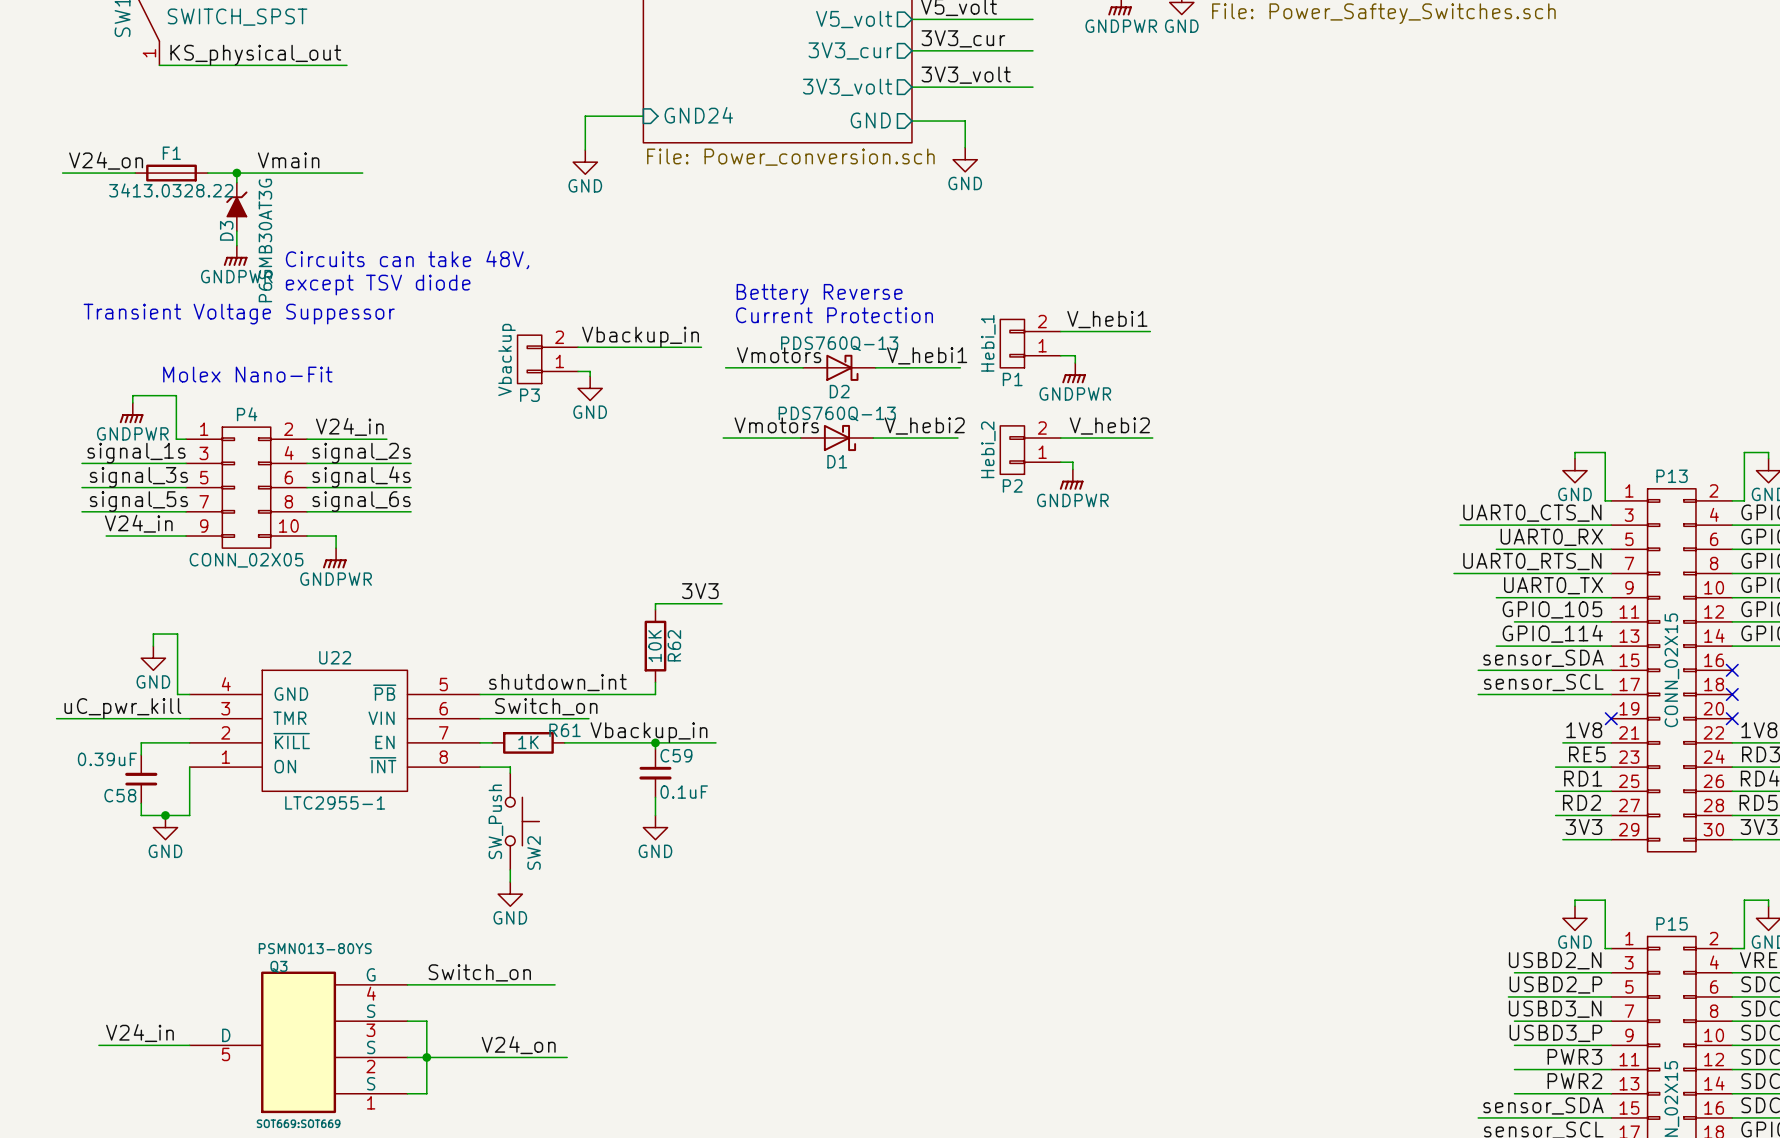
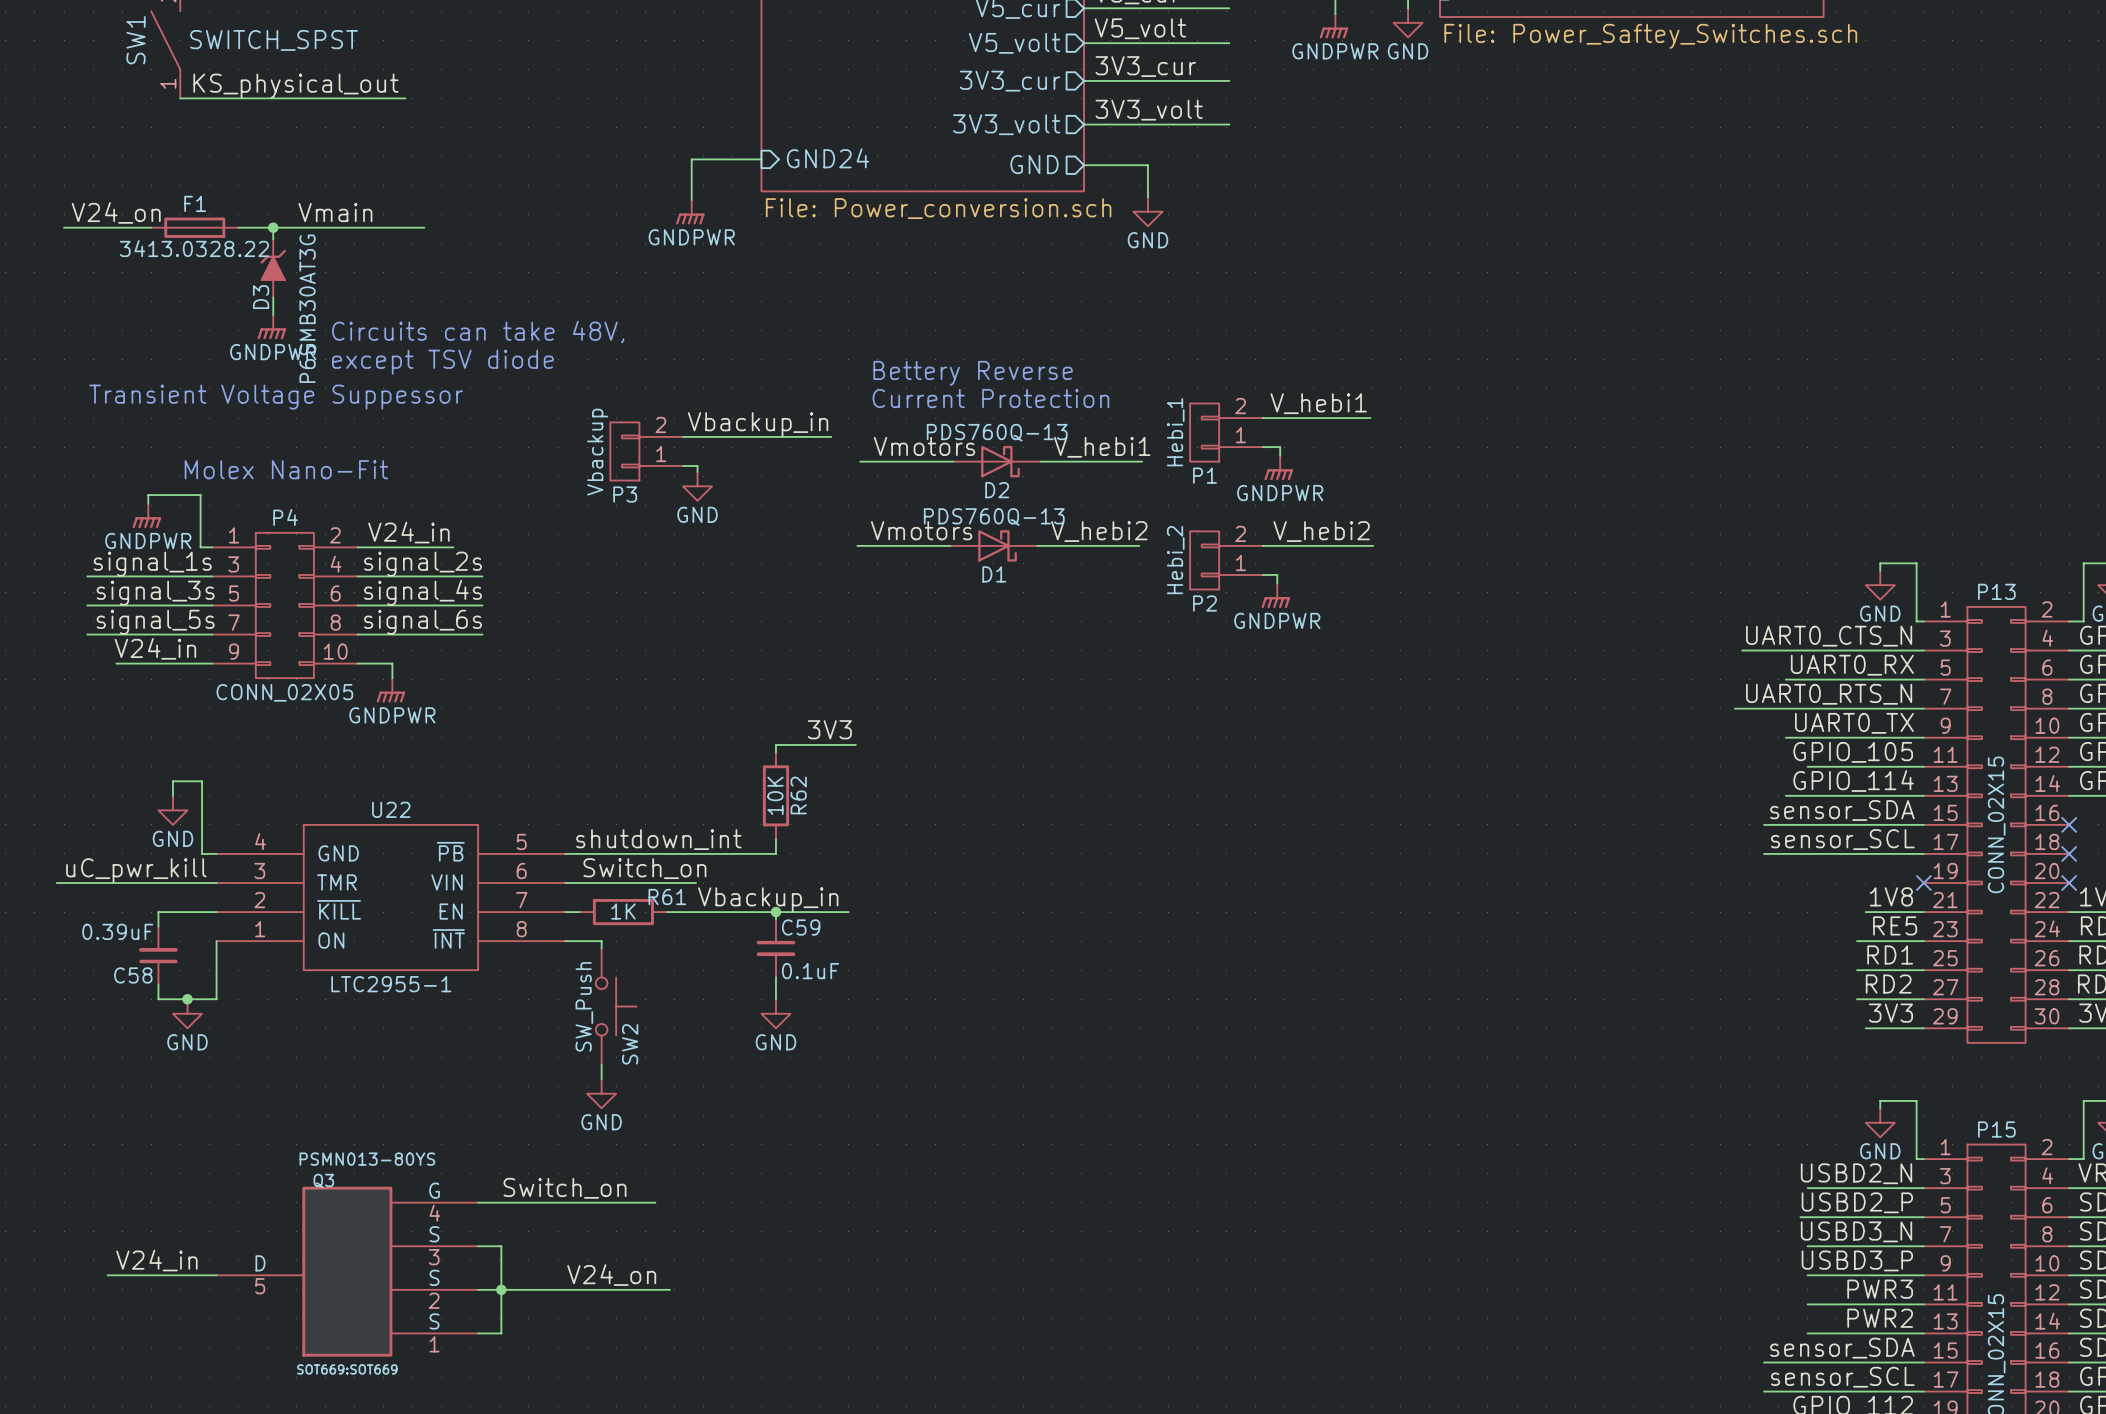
power symbol: GND (585, 162) -> GNDPWR (690, 212)

